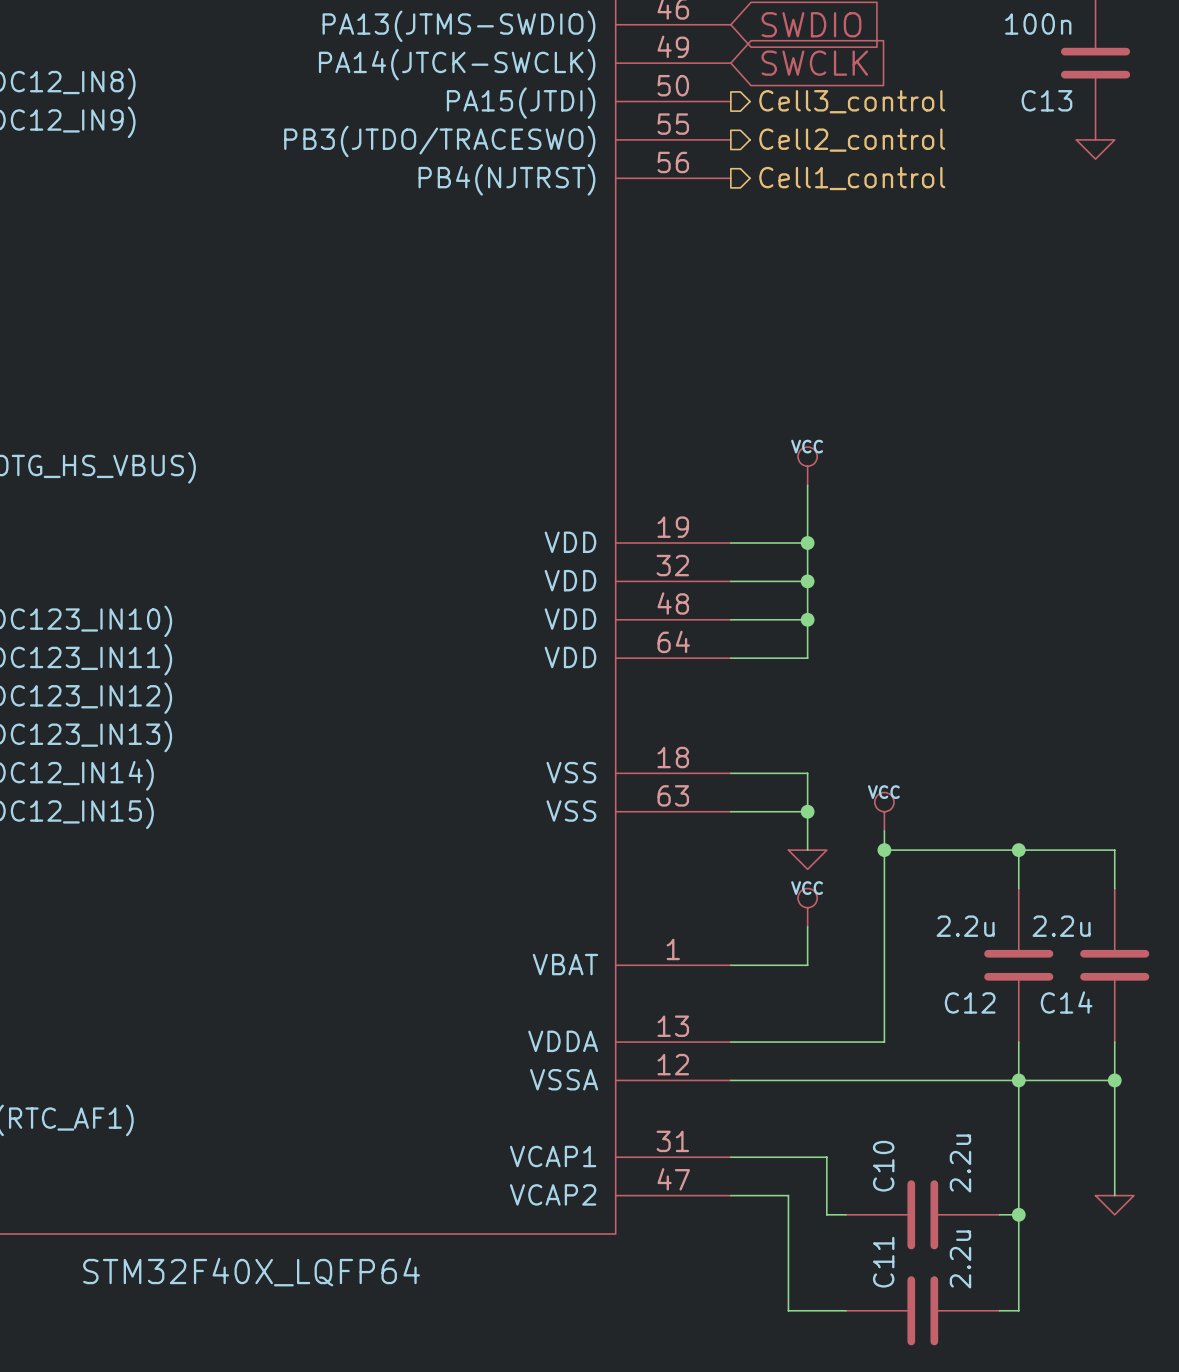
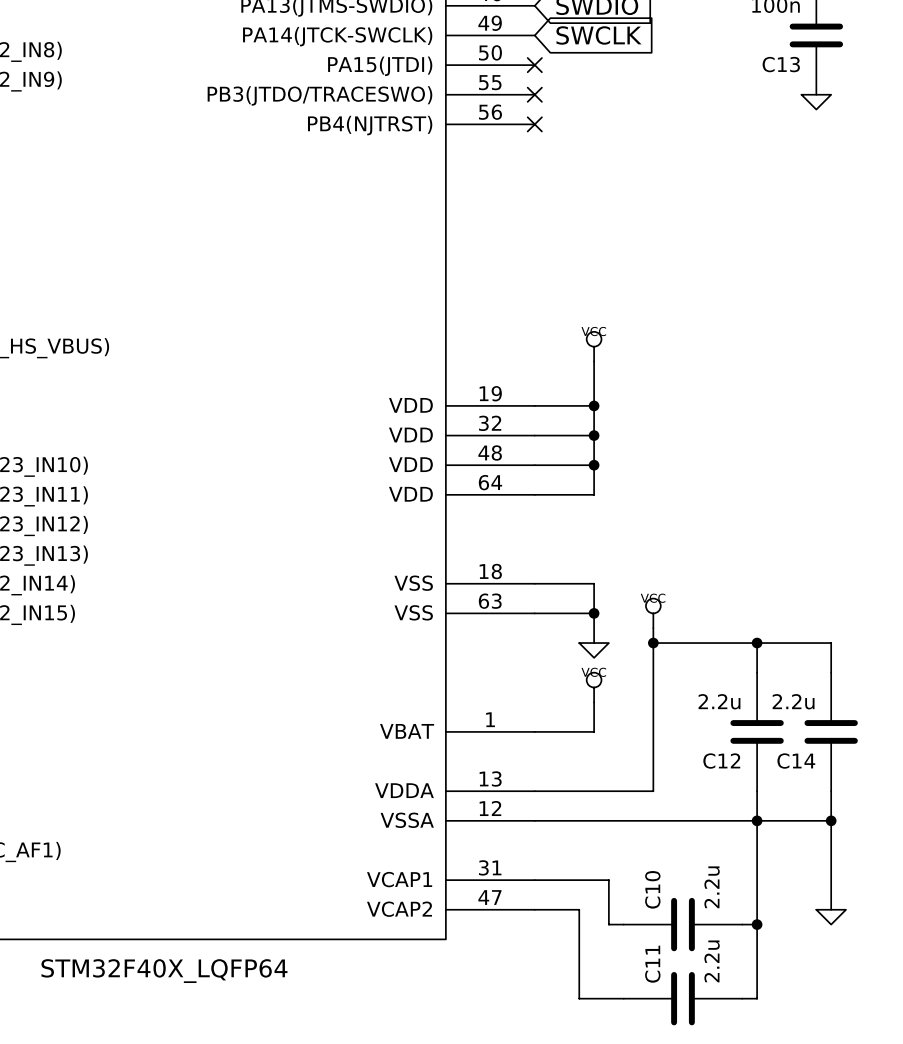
no-connect mark: none -> (534, 65)
hierarchical label: Cell3_control (852, 101) -> none
no-connect mark: none -> (534, 94)
hierarchical label: Cell2_control (852, 140) -> none
no-connect mark: none -> (534, 124)
hierarchical label: Cell1_control (852, 178) -> none

